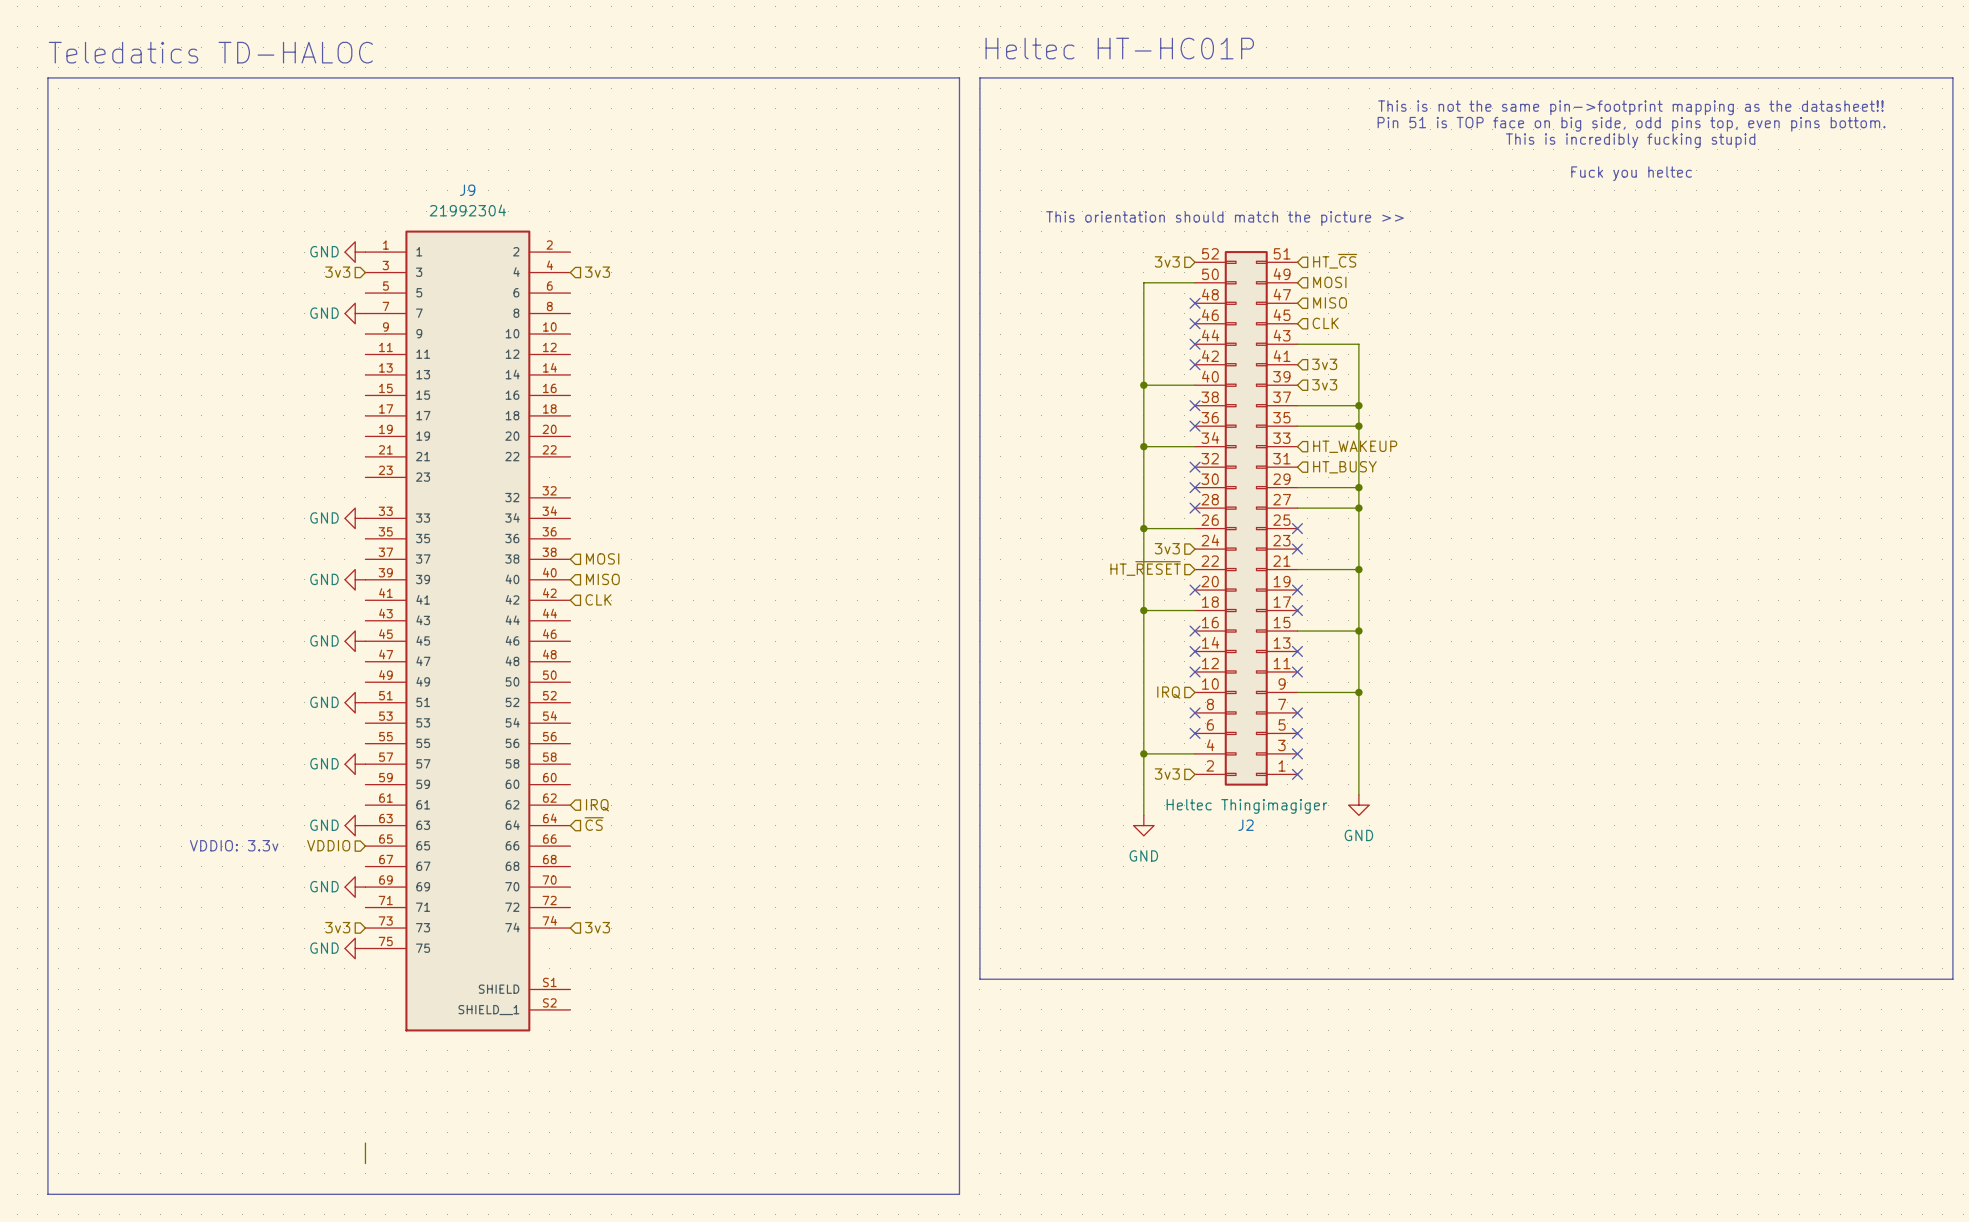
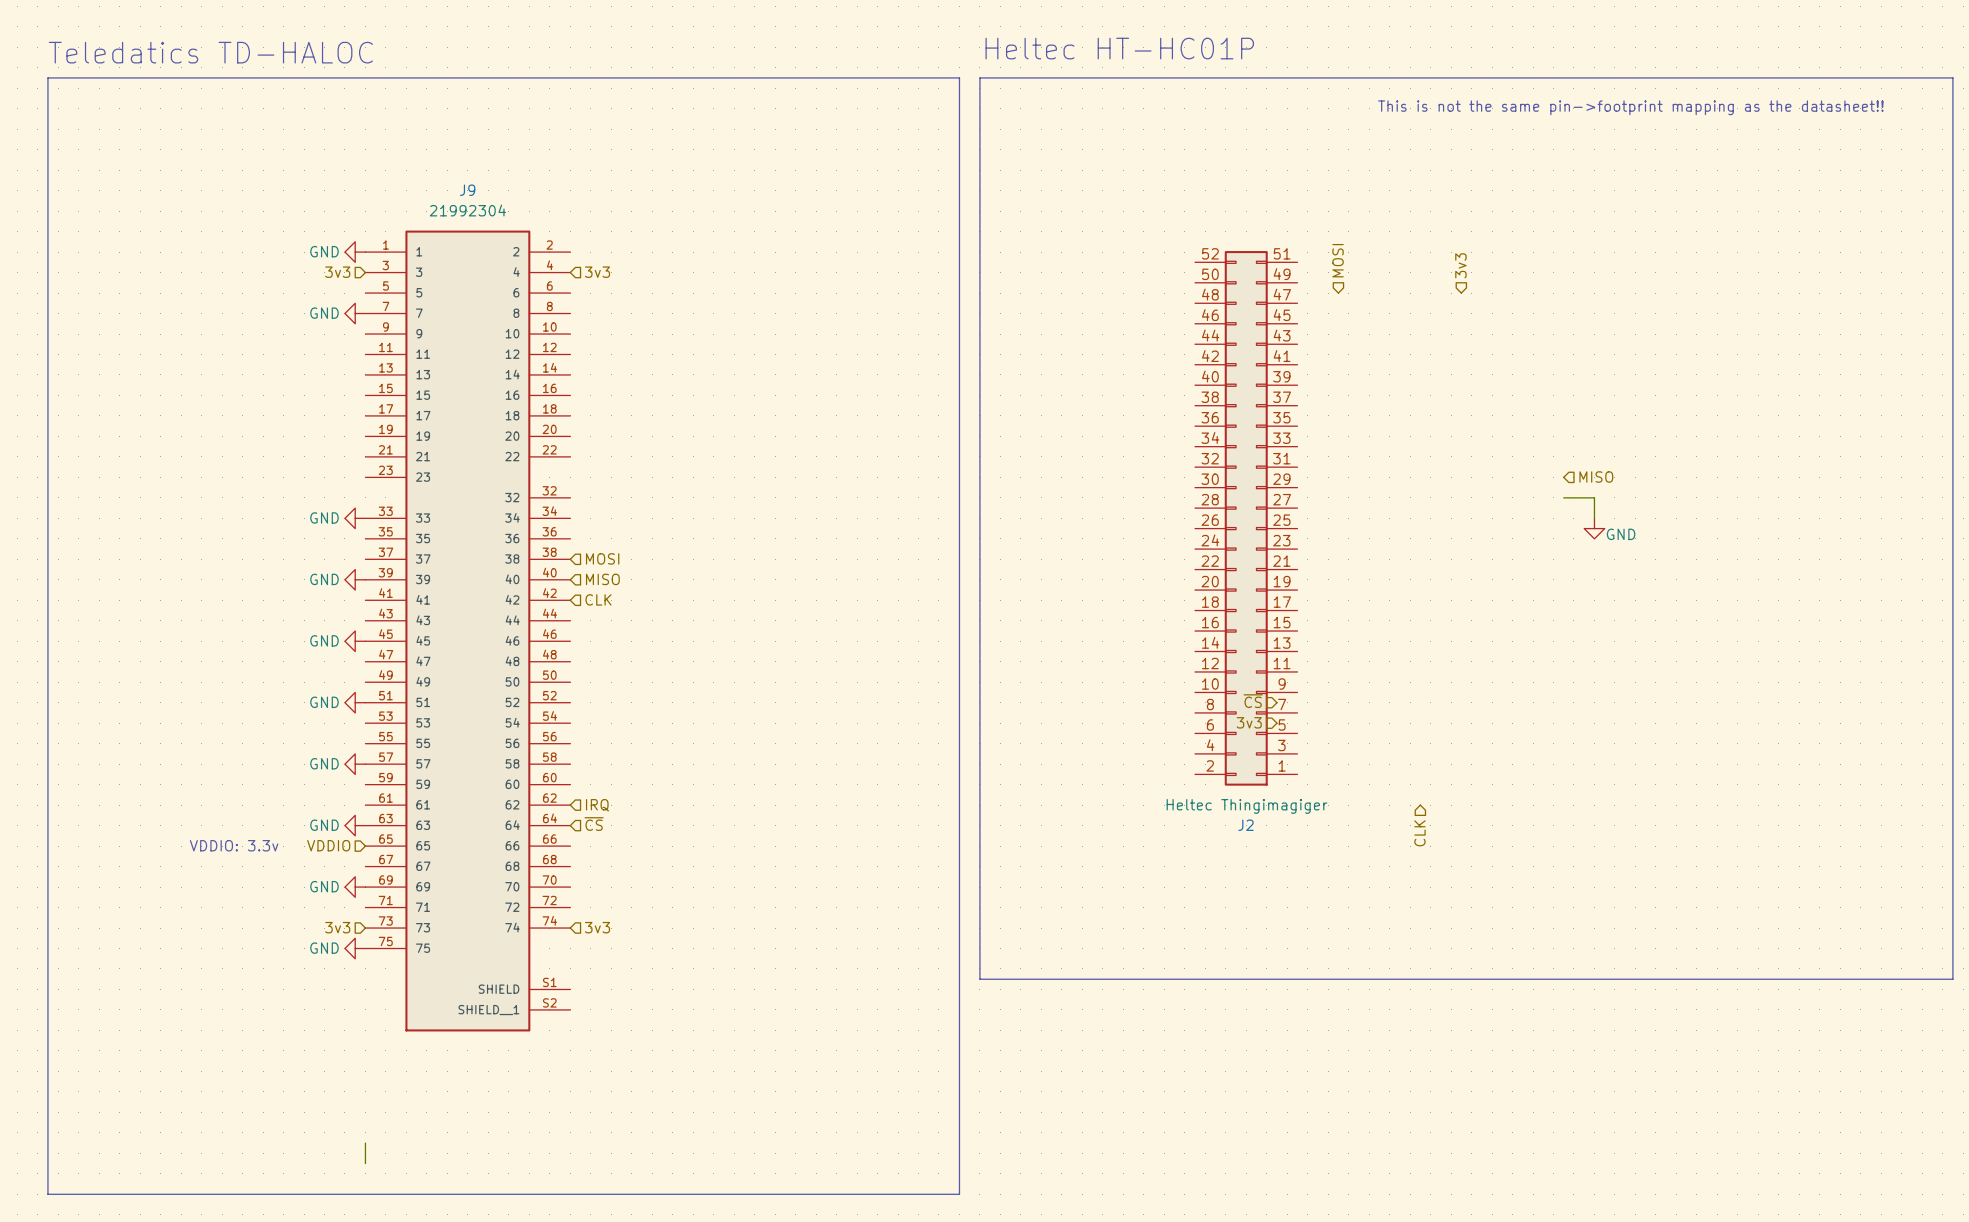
text: Pin 51 is TOP face on big side, odd pins top, even pins bottom. (1631, 124) -> none
text: This is incredibly fucking stupid (1630, 140) -> none
text: Fuck you heltec (1631, 173) -> none
text: This orientation should match the picture >> (1225, 218) -> none
hierarchical label: 3v3 (1167, 261) -> none
hierarchical label: HT_~{CS} (1335, 261) -> none
hierarchical label: none -> 3v3 (1460, 265)
wire: (1195, 282) (1143, 282) (1143, 815) -> none
hierarchical label rotation: 0° (1329, 282) -> 90° counterclockwise (1338, 260)
hierarchical label: MISO (1330, 302) -> none
no-connect mark: (1195, 303) -> none
no-connect mark: (1195, 323) -> none
hierarchical label: CLK (1325, 323) -> none
no-connect mark: (1195, 344) -> none
wire: (1297, 344) (1358, 344) (1358, 794) -> none
no-connect mark: (1195, 364) -> none
hierarchical label: 3v3 (1324, 364) -> none
hierarchical label: 3v3 (1324, 384) -> none
wire: (1143, 385) (1195, 385) -> none
junction: (1143, 385) -> none
no-connect mark: (1195, 405) -> none
wire: (1297, 405) (1358, 405) -> none
junction: (1358, 405) -> none
no-connect mark: (1195, 426) -> none
wire: (1297, 426) (1358, 426) -> none
junction: (1358, 426) -> none
wire: (1143, 446) (1195, 446) -> none
junction: (1143, 446) -> none
hierarchical label: HT_WAKEUP (1355, 446) -> none
no-connect mark: (1195, 467) -> none
hierarchical label: HT_BUSY (1344, 467) -> none
hierarchical label: none -> MISO (1596, 477)
no-connect mark: (1195, 487) -> none
wire: (1297, 487) (1358, 487) -> none
junction: (1358, 487) -> none
wire: none -> (1563, 497) (1594, 497) (1594, 518)
no-connect mark: (1195, 508) -> none
wire: (1297, 508) (1358, 508) -> none
junction: (1358, 508) -> none
wire: (1143, 528) (1195, 528) -> none
junction: (1143, 528) -> none
no-connect mark: (1297, 528) -> none
power symbol: none -> GND (1594, 528)
hierarchical label: 3v3 (1167, 548) -> none
no-connect mark: (1297, 549) -> none
hierarchical label: HT_~{RESET} (1145, 568) -> none
wire: (1297, 569) (1358, 569) -> none
junction: (1358, 569) -> none
no-connect mark: (1195, 590) -> none
no-connect mark: (1297, 590) -> none
wire: (1143, 610) (1195, 610) -> none
junction: (1143, 610) -> none
no-connect mark: (1297, 610) -> none
no-connect mark: (1195, 631) -> none
wire: (1297, 631) (1358, 631) -> none
junction: (1358, 631) -> none
no-connect mark: (1195, 651) -> none
no-connect mark: (1297, 651) -> none
no-connect mark: (1195, 671) -> none
no-connect mark: (1297, 671) -> none
hierarchical label: IRQ (1168, 692) -> none
wire: (1297, 692) (1358, 692) -> none
junction: (1358, 692) -> none
hierarchical label: none -> ~{CS} (1253, 701)
no-connect mark: (1195, 712) -> none
no-connect mark: (1297, 712) -> none
hierarchical label: none -> 3v3 (1249, 722)
no-connect mark: (1195, 733) -> none
no-connect mark: (1297, 733) -> none
wire: (1143, 753) (1195, 753) -> none
junction: (1143, 753) -> none
no-connect mark: (1297, 753) -> none
hierarchical label: 3v3 (1167, 774) -> none
no-connect mark: (1297, 774) -> none
power symbol: GND (1358, 805) -> none
power symbol: GND (1143, 825) -> none
hierarchical label: none -> CLK (1419, 833)

